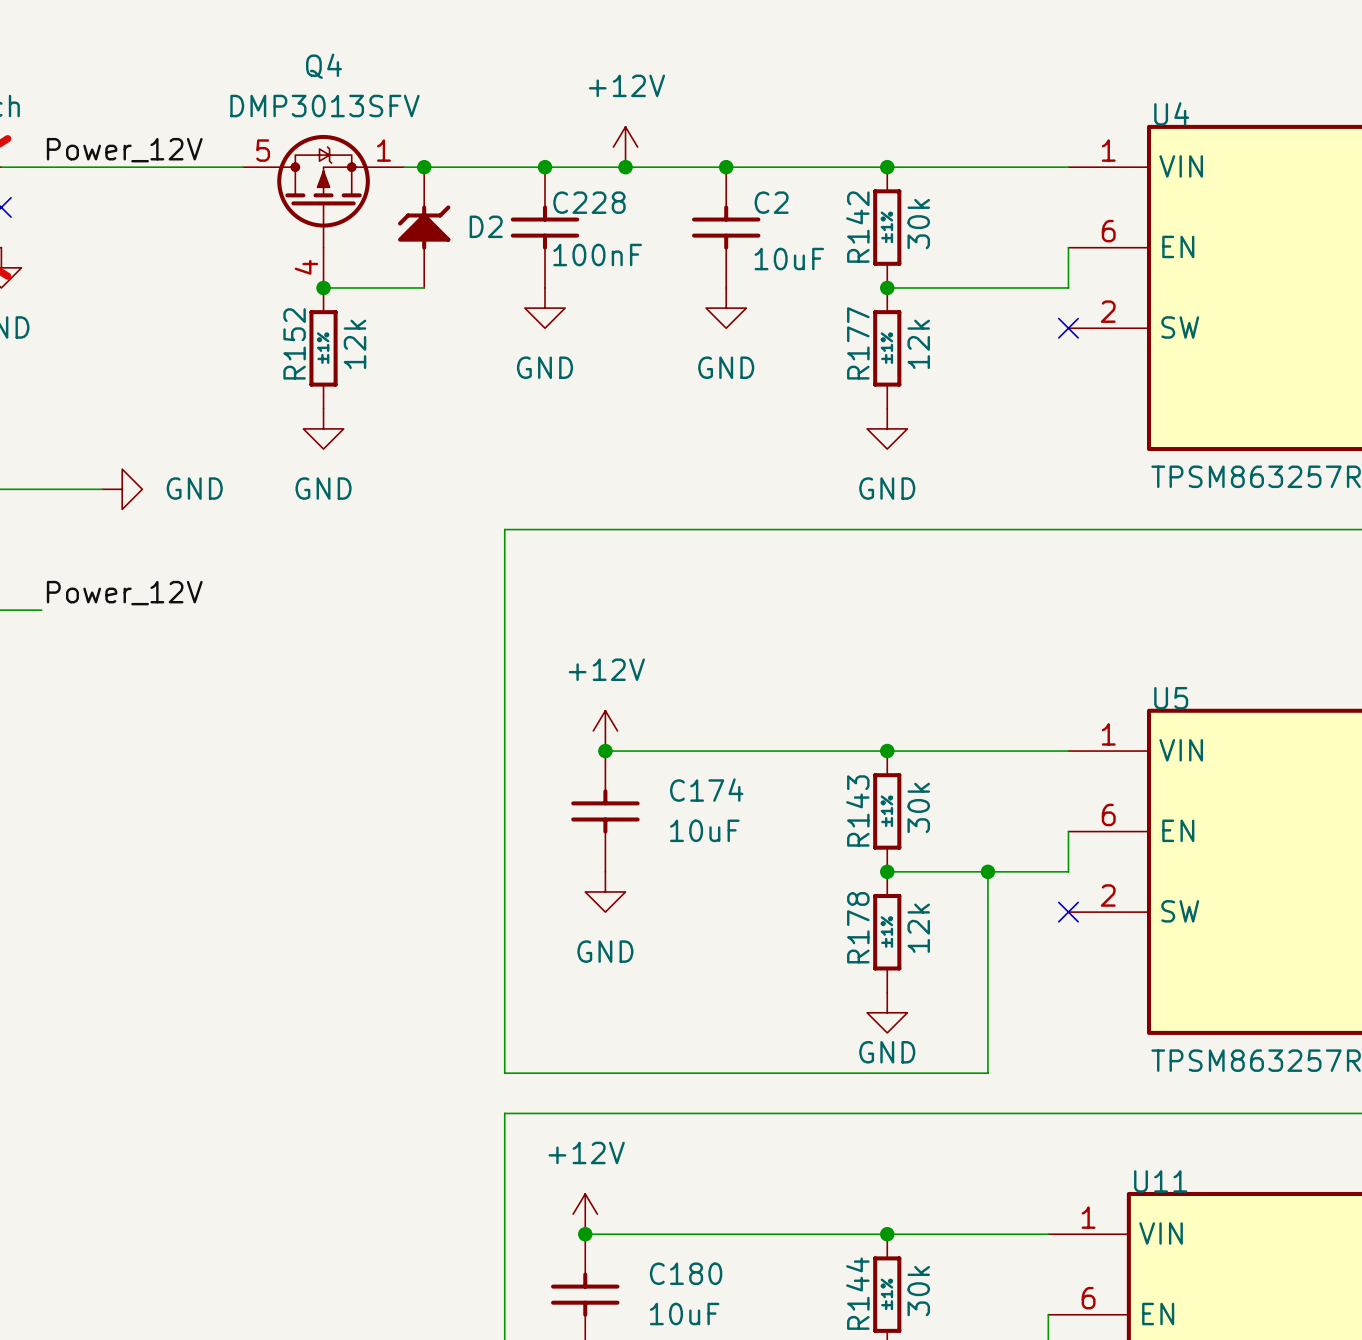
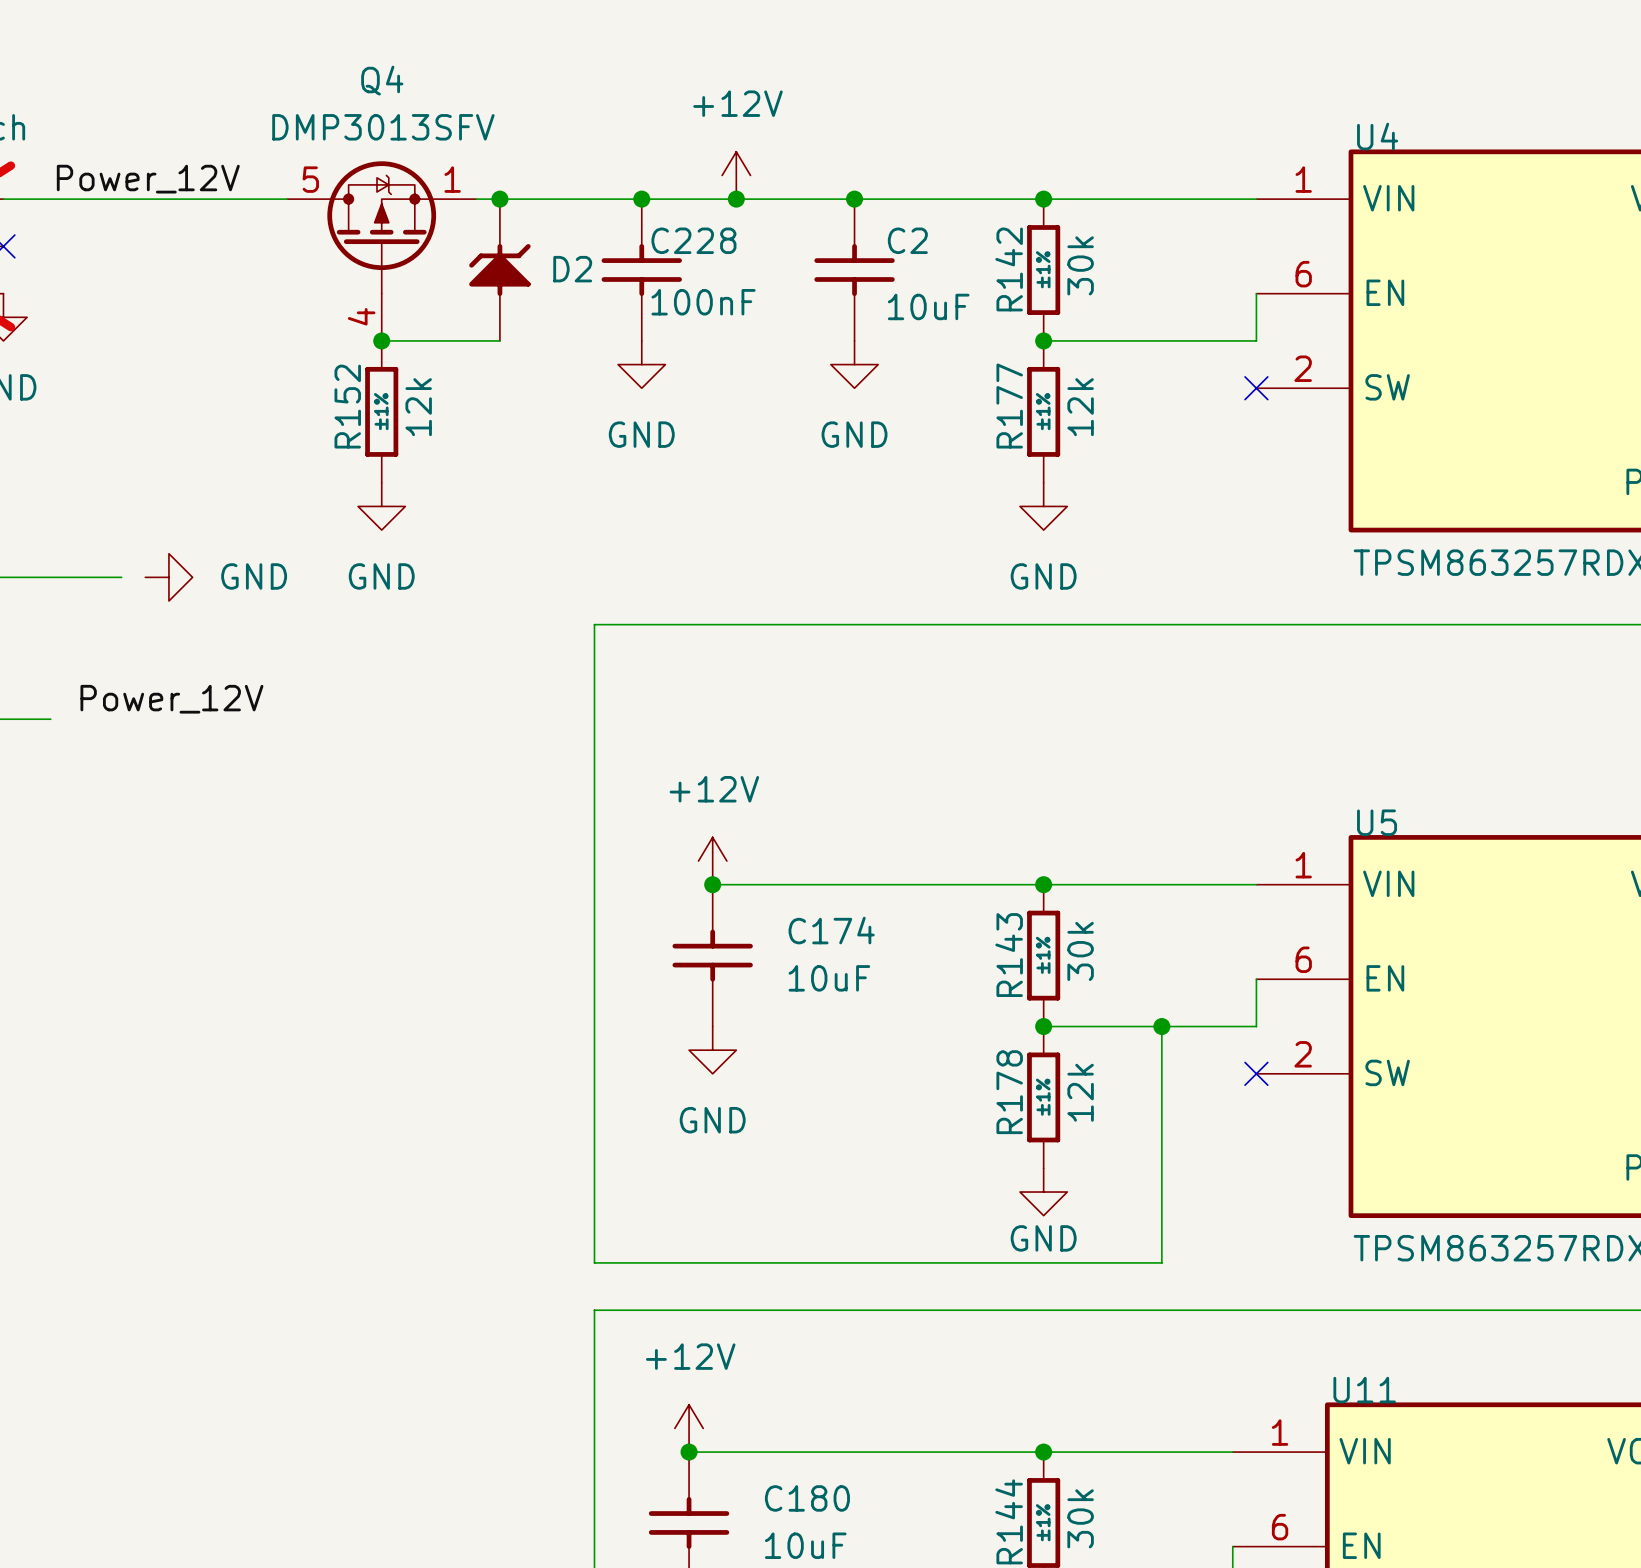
power symbol position: GND (122, 489) -> GND (168, 577)
label position: Power_12V (124, 593) -> Power_12V (171, 699)

